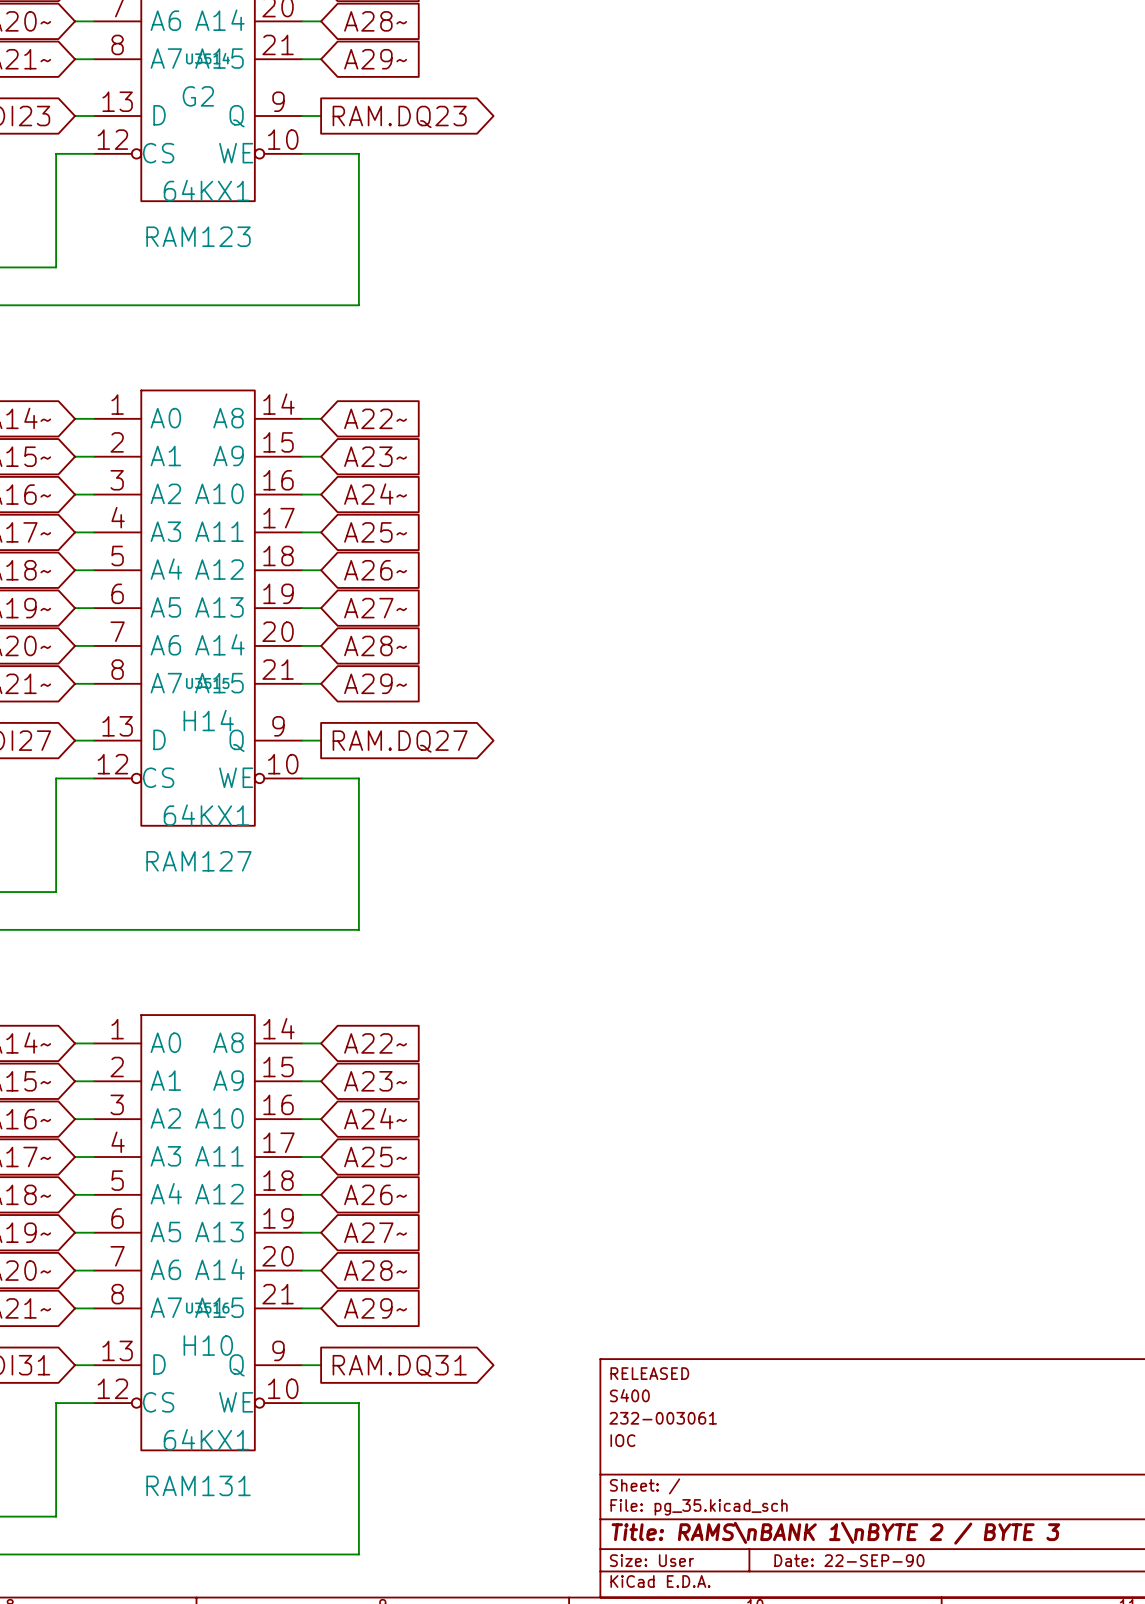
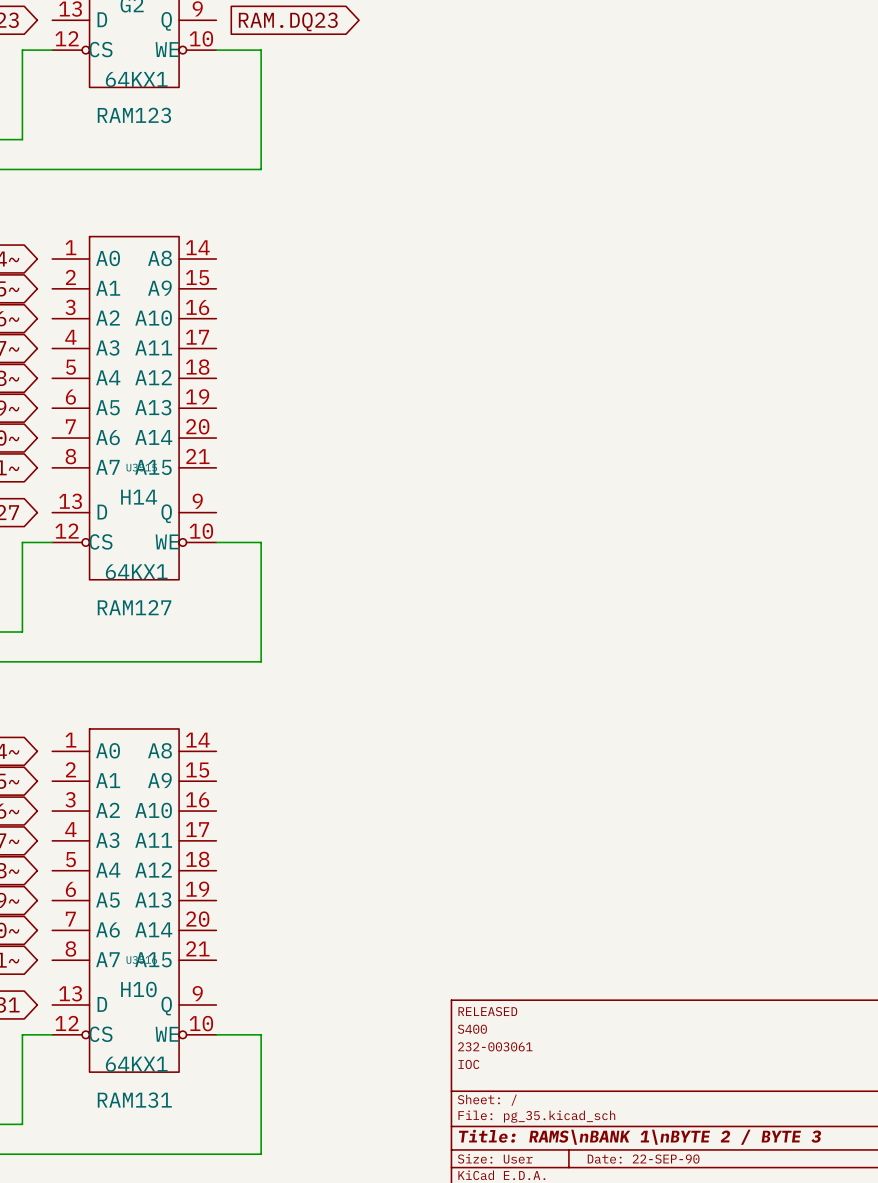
wire: (75, 116) (93, 116) -> none
wire: (302, 116) (321, 116) -> none
wire: (75, 418) (93, 418) -> none
wire: (302, 418) (321, 418) -> none
global label: A22~ (375, 418) -> none
wire: (75, 456) (93, 456) -> none
wire: (302, 456) (321, 456) -> none
global label: A23~ (375, 456) -> none
wire: (75, 494) (93, 494) -> none
wire: (302, 494) (321, 494) -> none
global label: A24~ (375, 494) -> none
wire: (75, 532) (93, 532) -> none
wire: (302, 532) (321, 532) -> none
global label: A25~ (375, 532) -> none
wire: (75, 570) (93, 570) -> none
wire: (302, 570) (321, 570) -> none
global label: A26~ (375, 570) -> none
wire: (75, 608) (93, 608) -> none
wire: (302, 608) (321, 608) -> none
global label: A27~ (375, 608) -> none
wire: (75, 645) (93, 645) -> none
wire: (302, 645) (321, 645) -> none
global label: A28~ (375, 645) -> none
wire: (75, 683) (93, 683) -> none
wire: (302, 683) (321, 683) -> none
global label: A29~ (375, 683) -> none
wire: (75, 740) (93, 740) -> none
wire: (302, 740) (321, 740) -> none
global label: RAM.DQ27 (400, 741) -> none
wire: (75, 1043) (93, 1043) -> none
wire: (302, 1043) (321, 1043) -> none
global label: A22~ (375, 1043) -> none
wire: (75, 1081) (93, 1081) -> none
wire: (302, 1081) (321, 1081) -> none
global label: A23~ (375, 1081) -> none
global label: A24~ (375, 1118) -> none
wire: (75, 1119) (93, 1119) -> none
wire: (302, 1119) (321, 1119) -> none
wire: (75, 1157) (93, 1157) -> none
wire: (302, 1157) (321, 1157) -> none
global label: A25~ (375, 1157) -> none
wire: (75, 1194) (93, 1194) -> none
wire: (302, 1194) (321, 1194) -> none
global label: A26~ (375, 1194) -> none
wire: (75, 1232) (93, 1232) -> none
wire: (302, 1232) (321, 1232) -> none
global label: A27~ (375, 1232) -> none
wire: (75, 1270) (93, 1270) -> none
wire: (302, 1270) (321, 1270) -> none
global label: A28~ (375, 1270) -> none
wire: (75, 1308) (93, 1308) -> none
wire: (302, 1308) (321, 1308) -> none
global label: A29~ (375, 1308) -> none
wire: (75, 1365) (93, 1365) -> none
wire: (302, 1365) (321, 1365) -> none
global label: RAM.DQ31 (399, 1366) -> none

